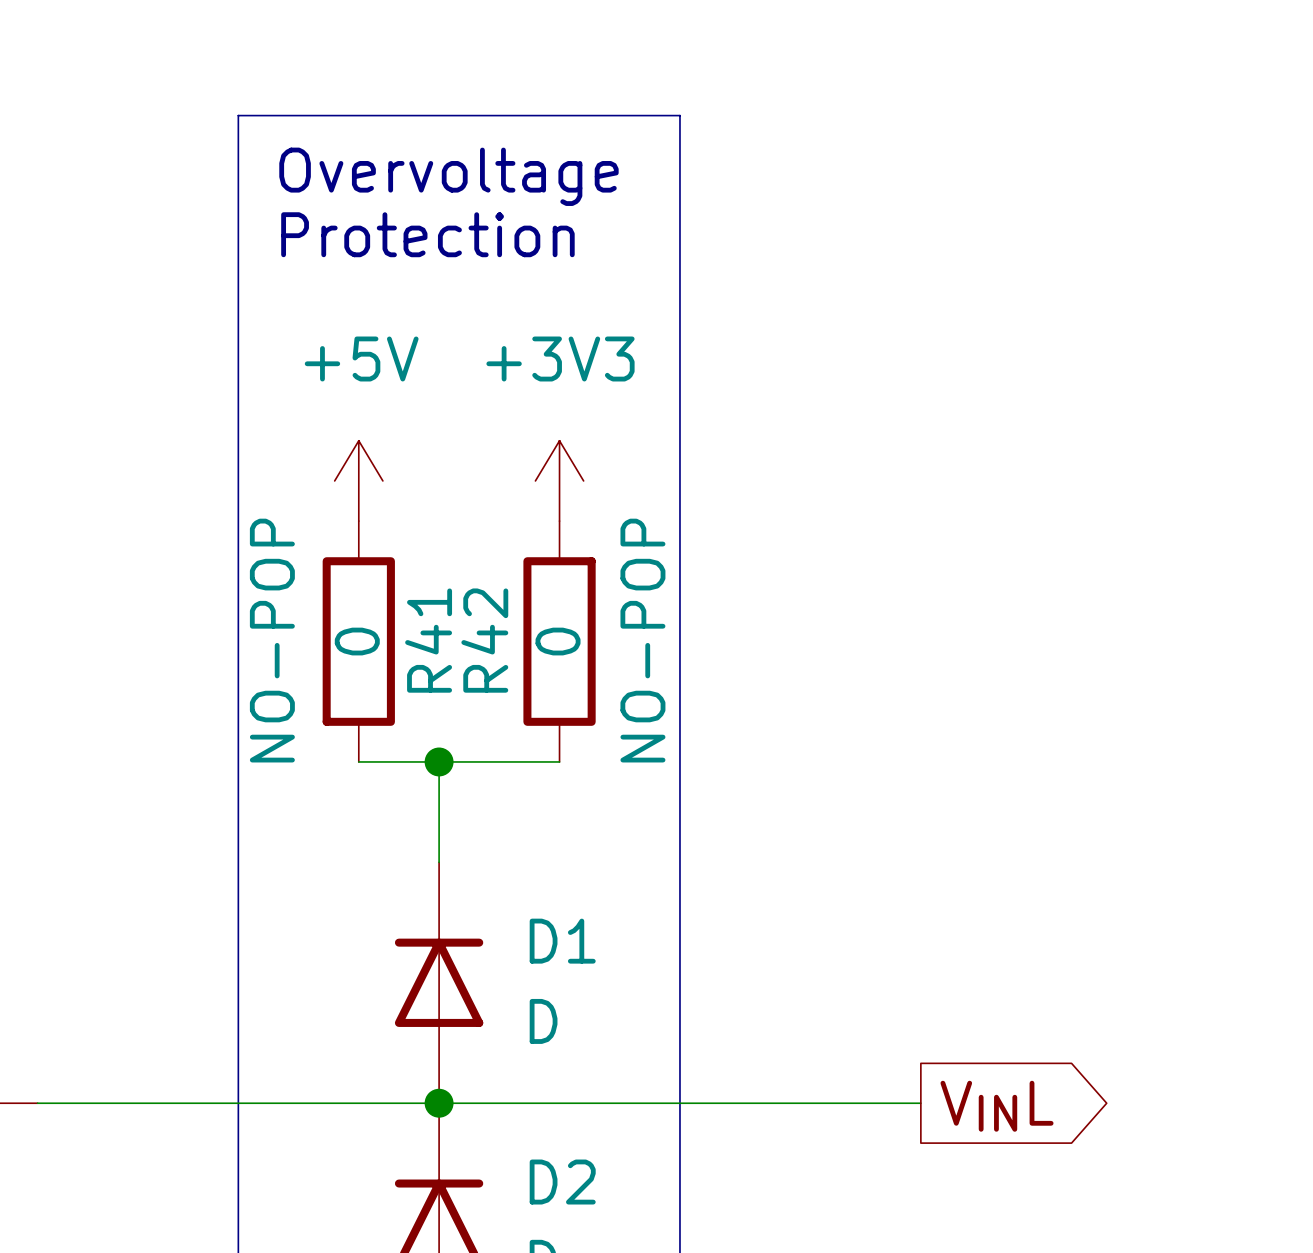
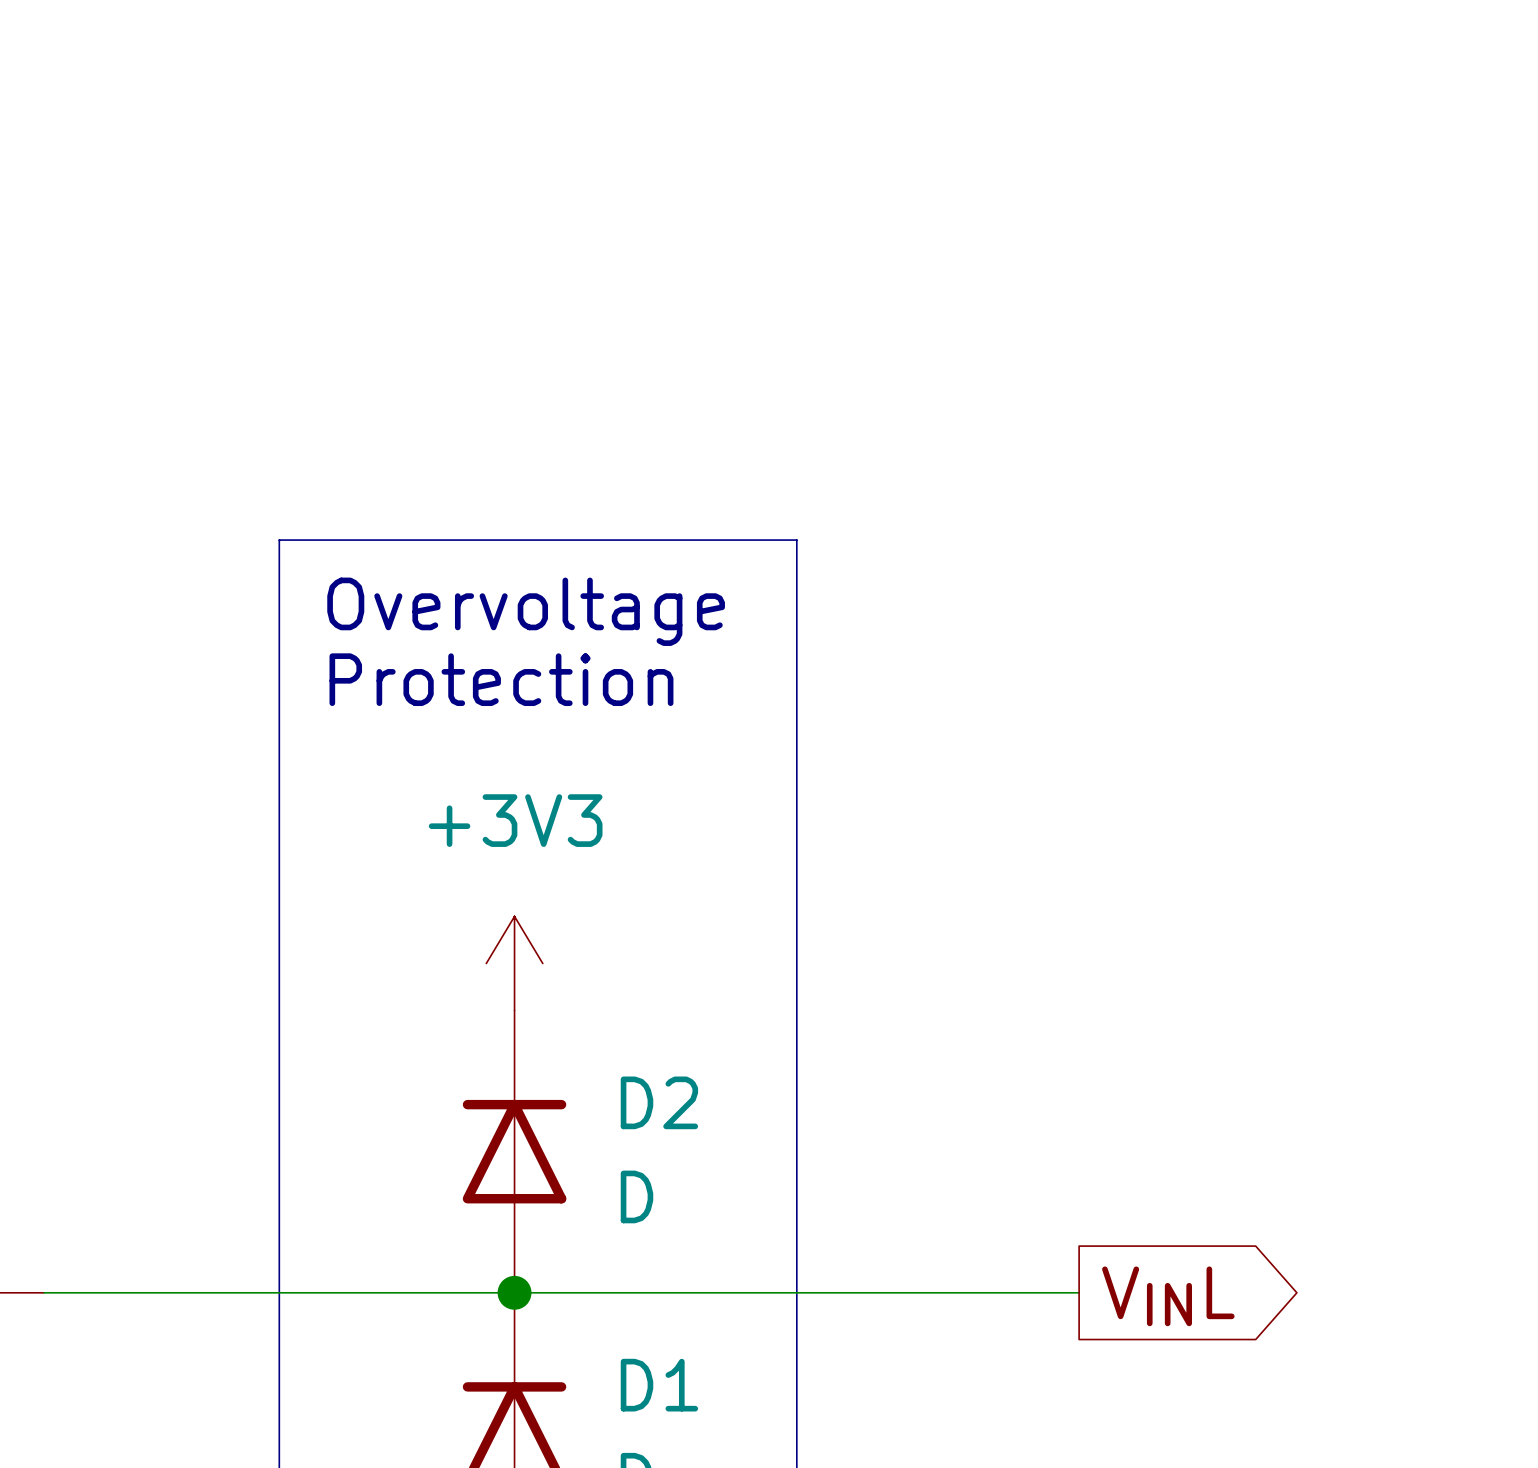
text position: Overvoltage (448, 176) -> Overvoltage (526, 611)
text position: Protection (427, 234) -> Protection (501, 679)
line: (238, 460) (238, 115) (679, 115) (679, 460) -> (279, 540) (796, 540)
power symbol: +5V (358, 480) -> none
power symbol position: +3V3 (559, 480) -> +3V3 (514, 963)
R41: 0 (358, 641) -> none
R42: 0 (559, 641) -> none
wire: (358, 761) (559, 761) -> none
junction: (439, 761) -> none
D1 name: D1 (562, 941) -> D2 (659, 1102)
D2 name: D2 (562, 1182) -> D1 (659, 1385)

